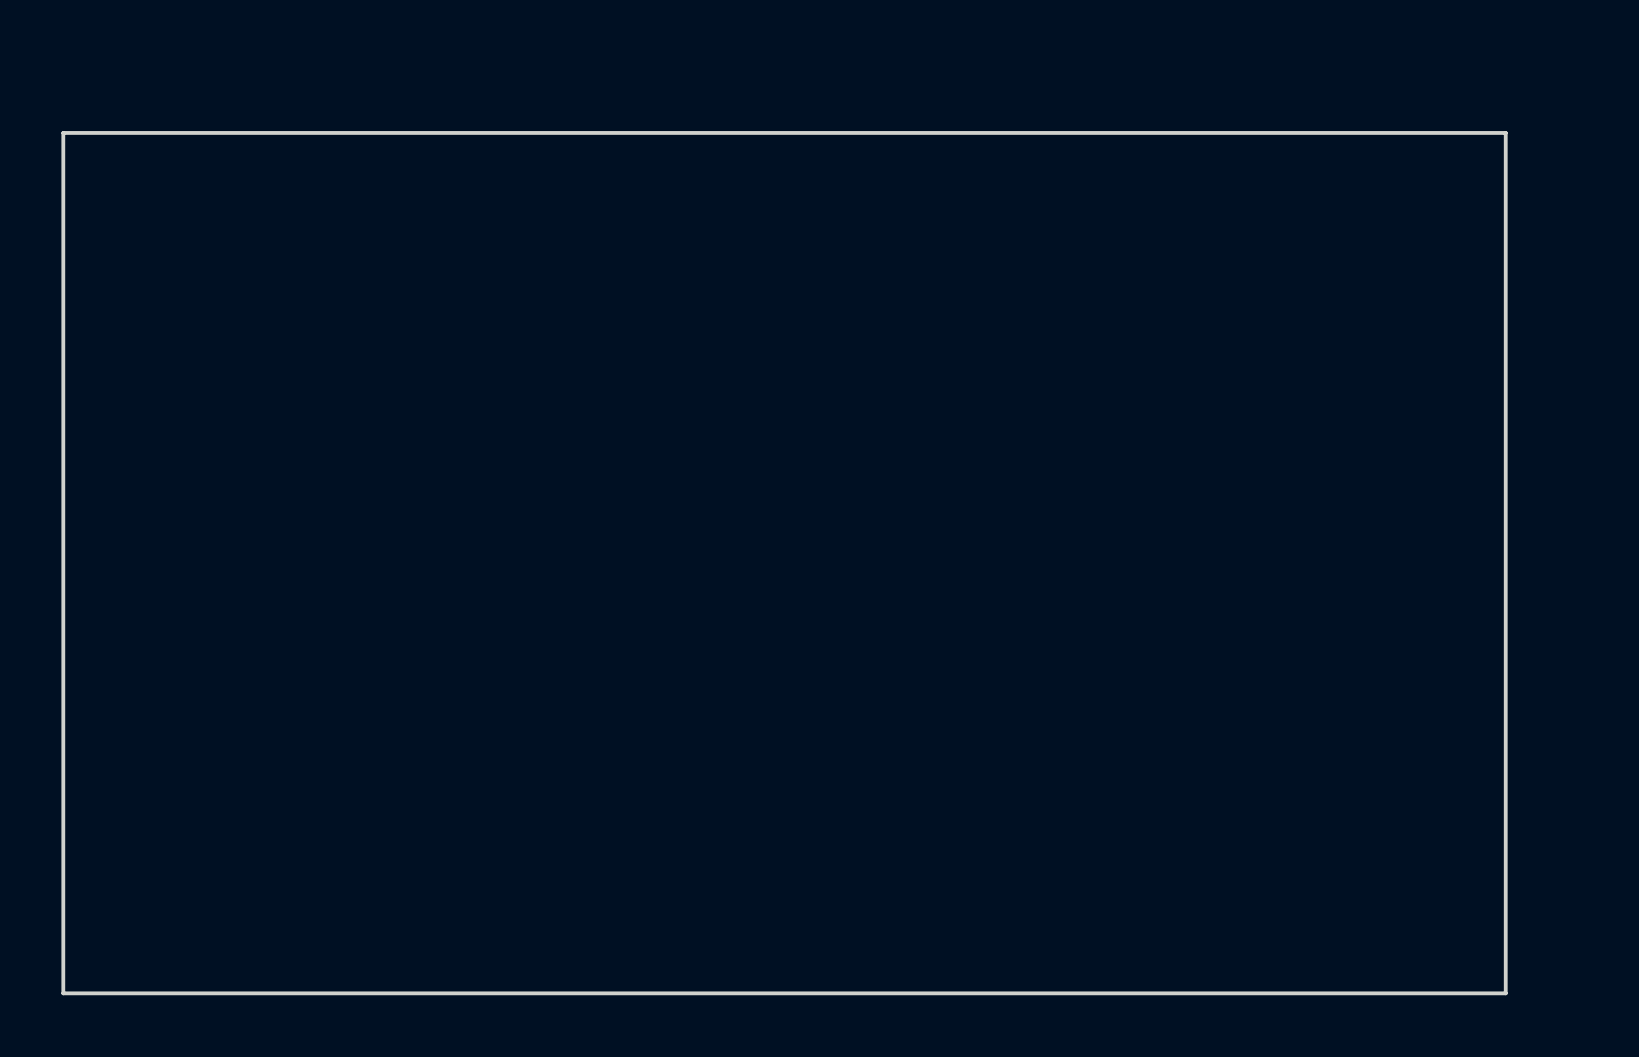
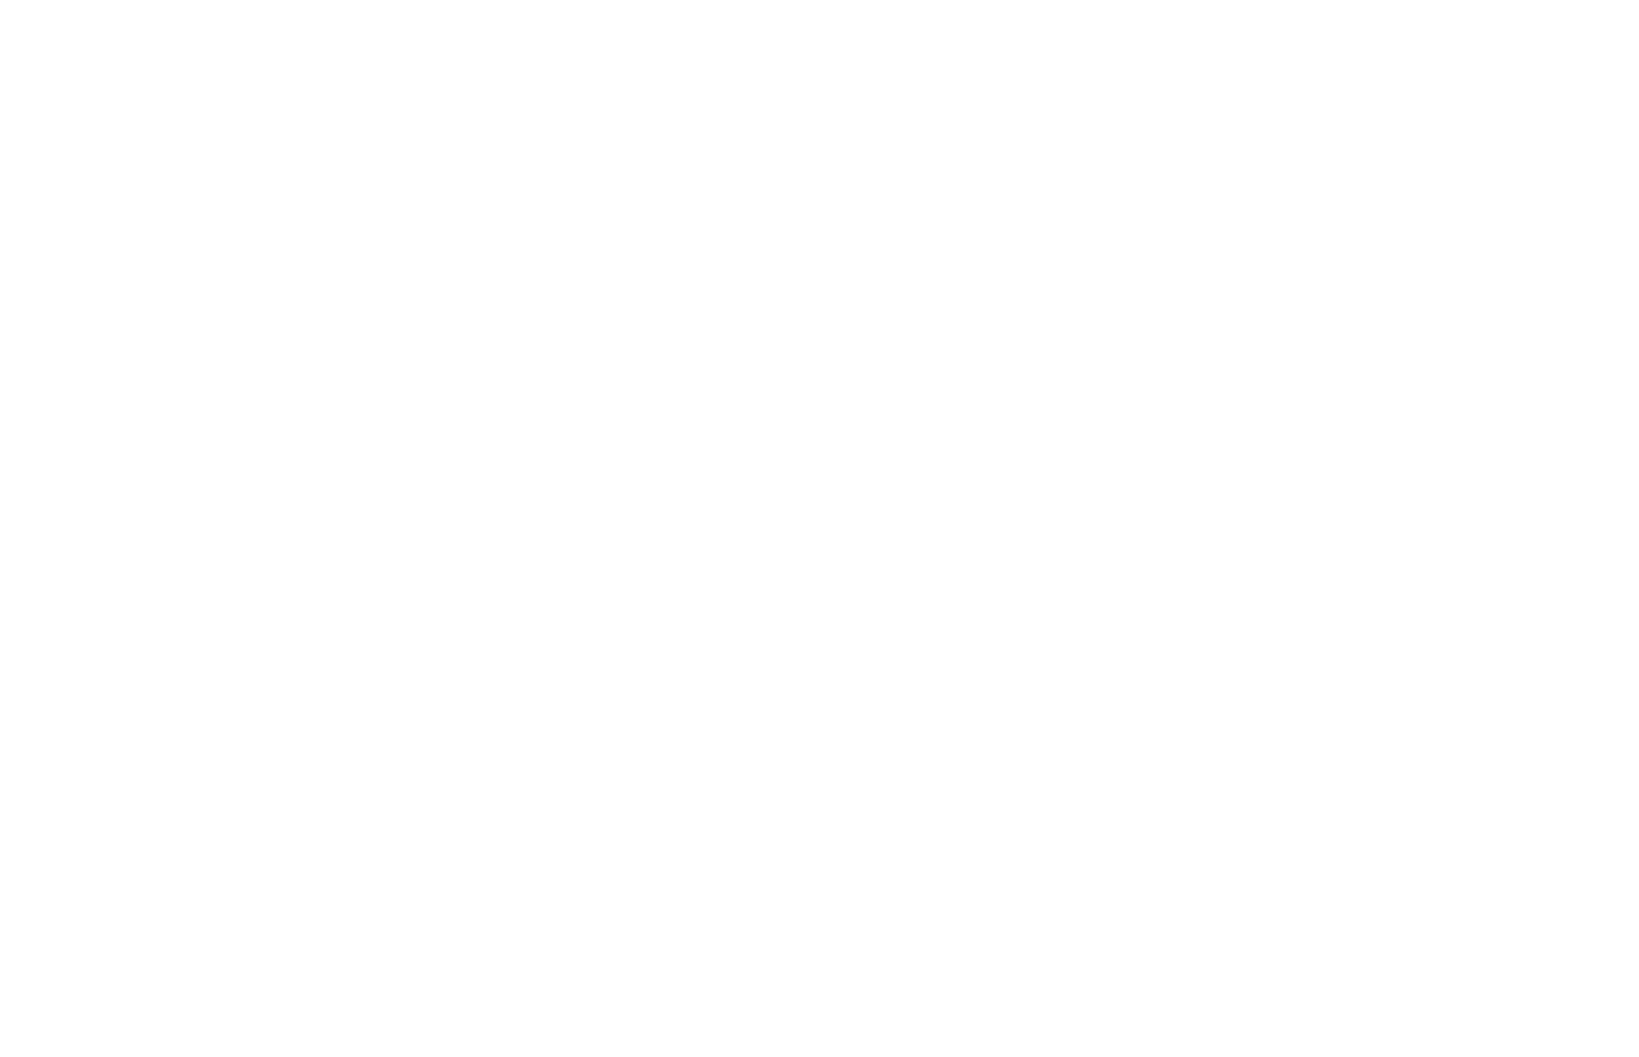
board edge: (63, 132) (63, 993) (1505, 993) (1505, 132) (63, 132) -> none

